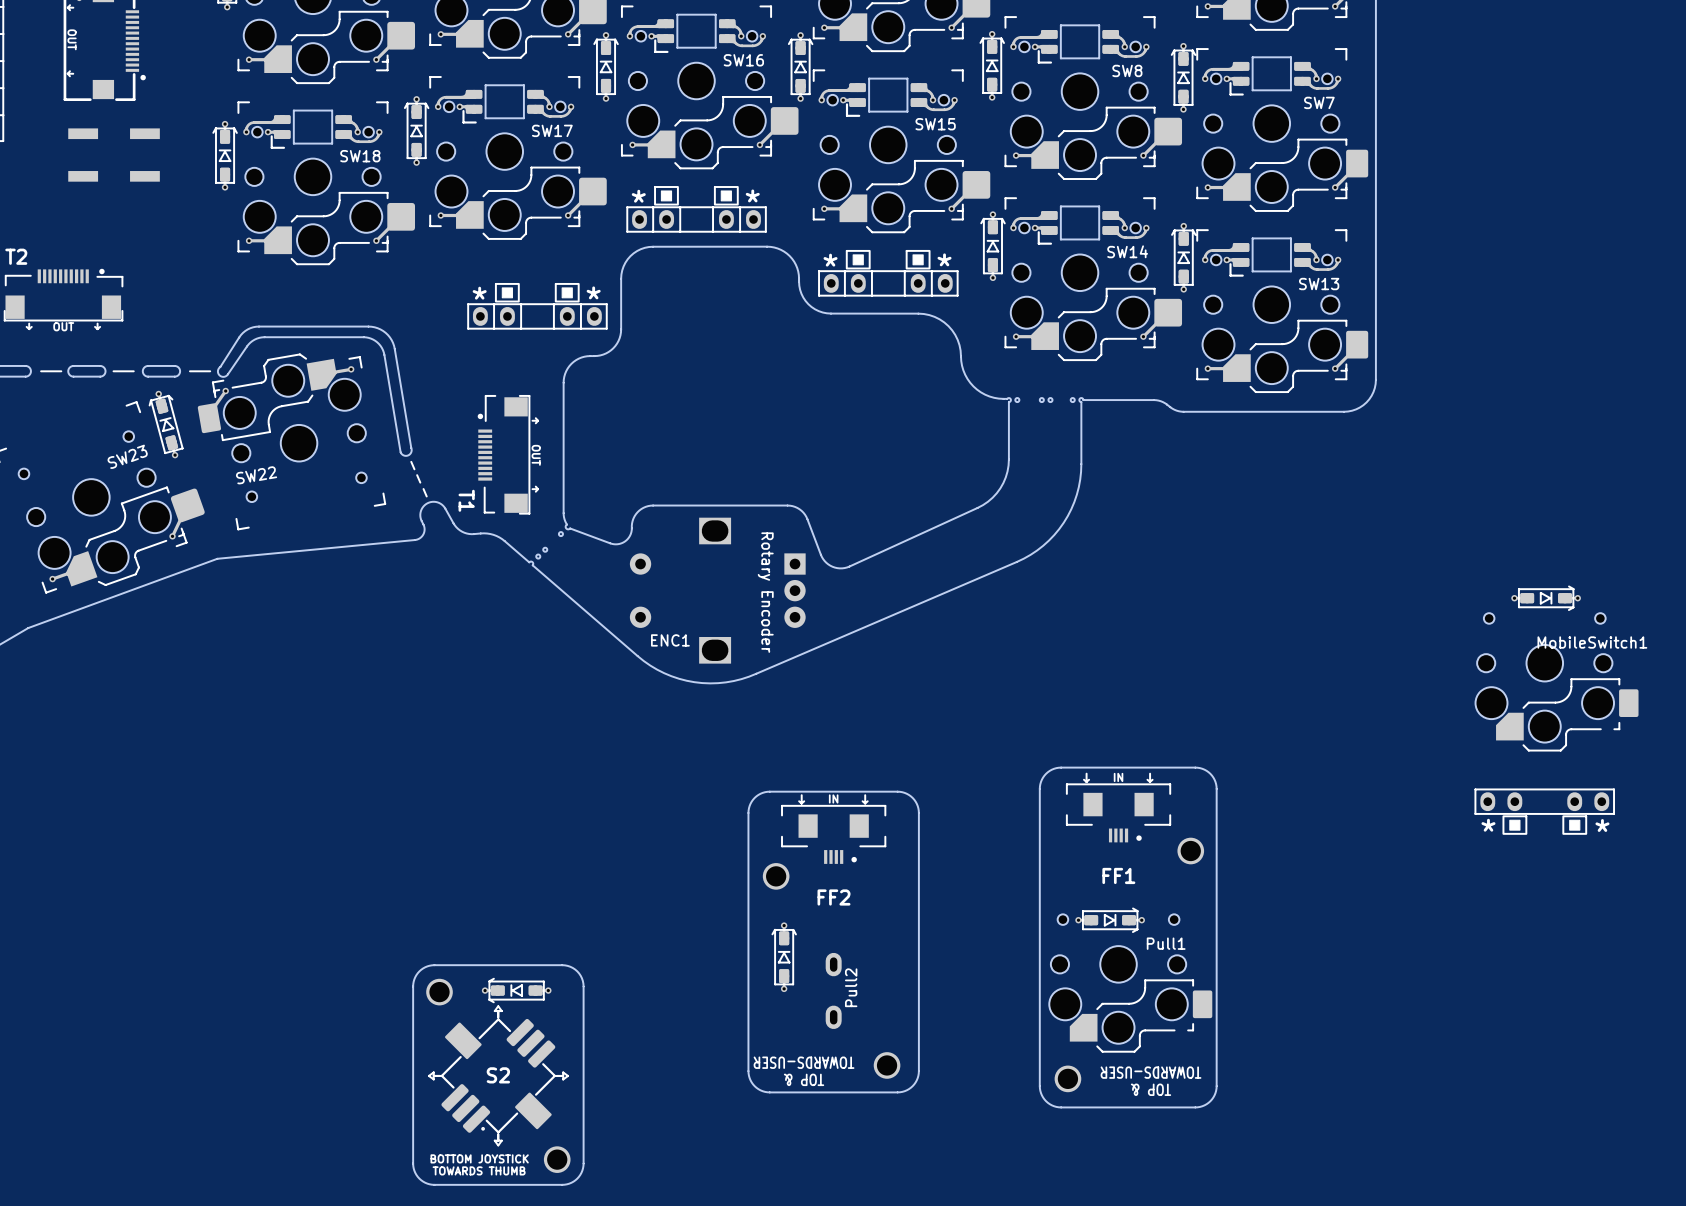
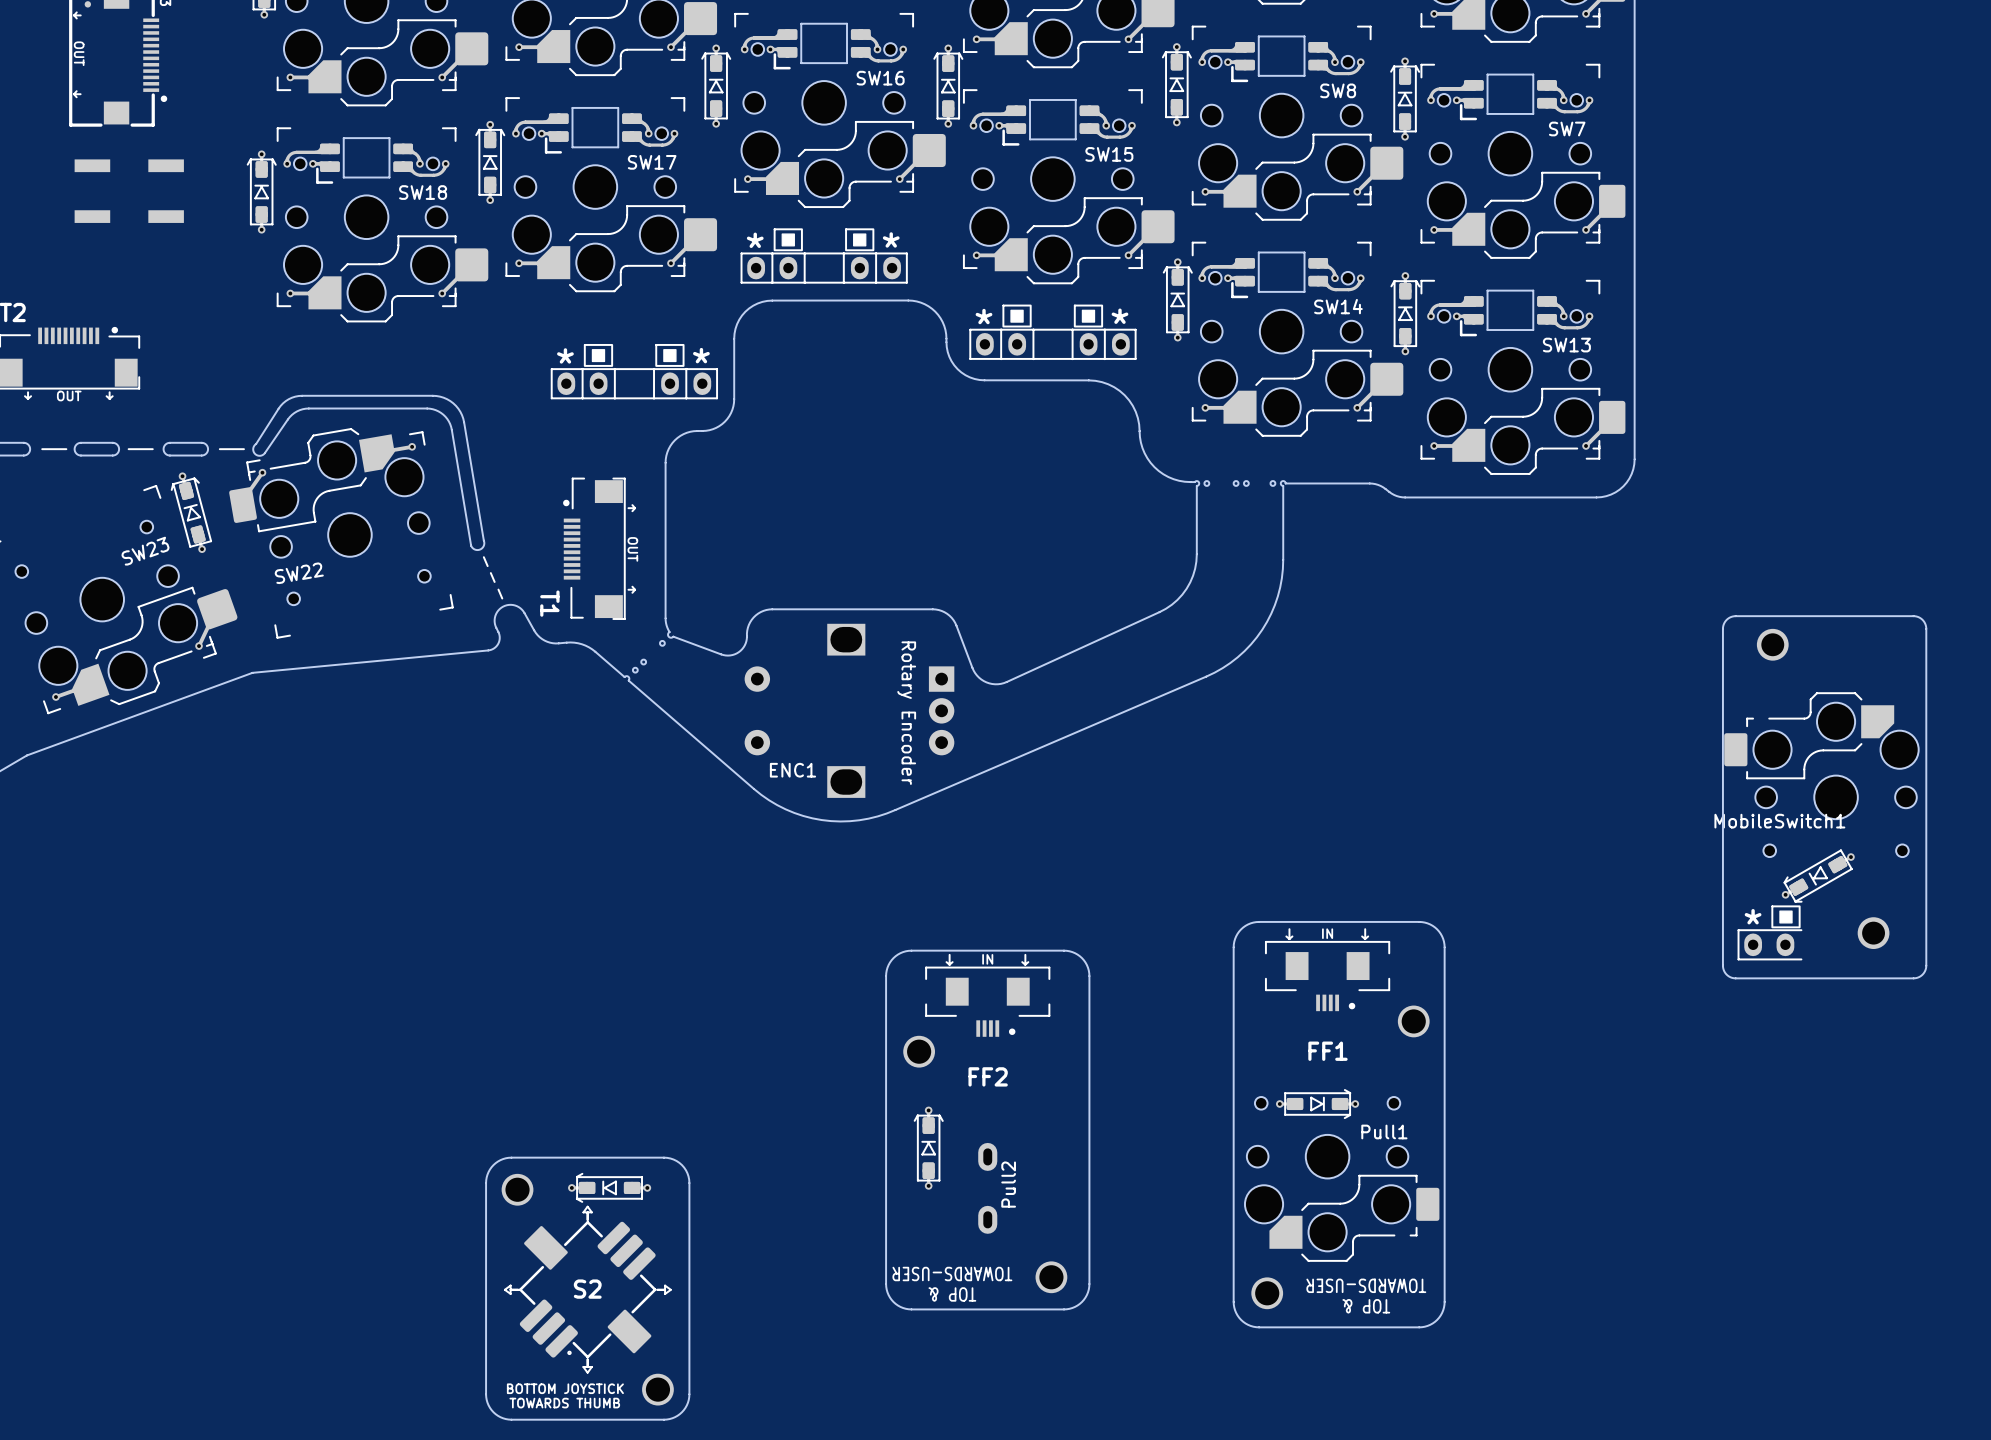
board edge: none -> (1913, 616) (1735, 616) (1728, 618) (1724, 623) (1722, 965) (1724, 972) (1730, 977) (1913, 978) (1920, 976) (1925, 971) (1926, 628) (1922, 619) (1913, 616)
part: none -> (1772, 644)
part: (1546, 598) -> none
MobileSwitch1 rotation: 0° (1557, 682) -> 180° (1821, 774)
part: none -> (1818, 875)
part: none -> (1769, 933)
part: none -> (1873, 933)
part: (1544, 811) -> none

